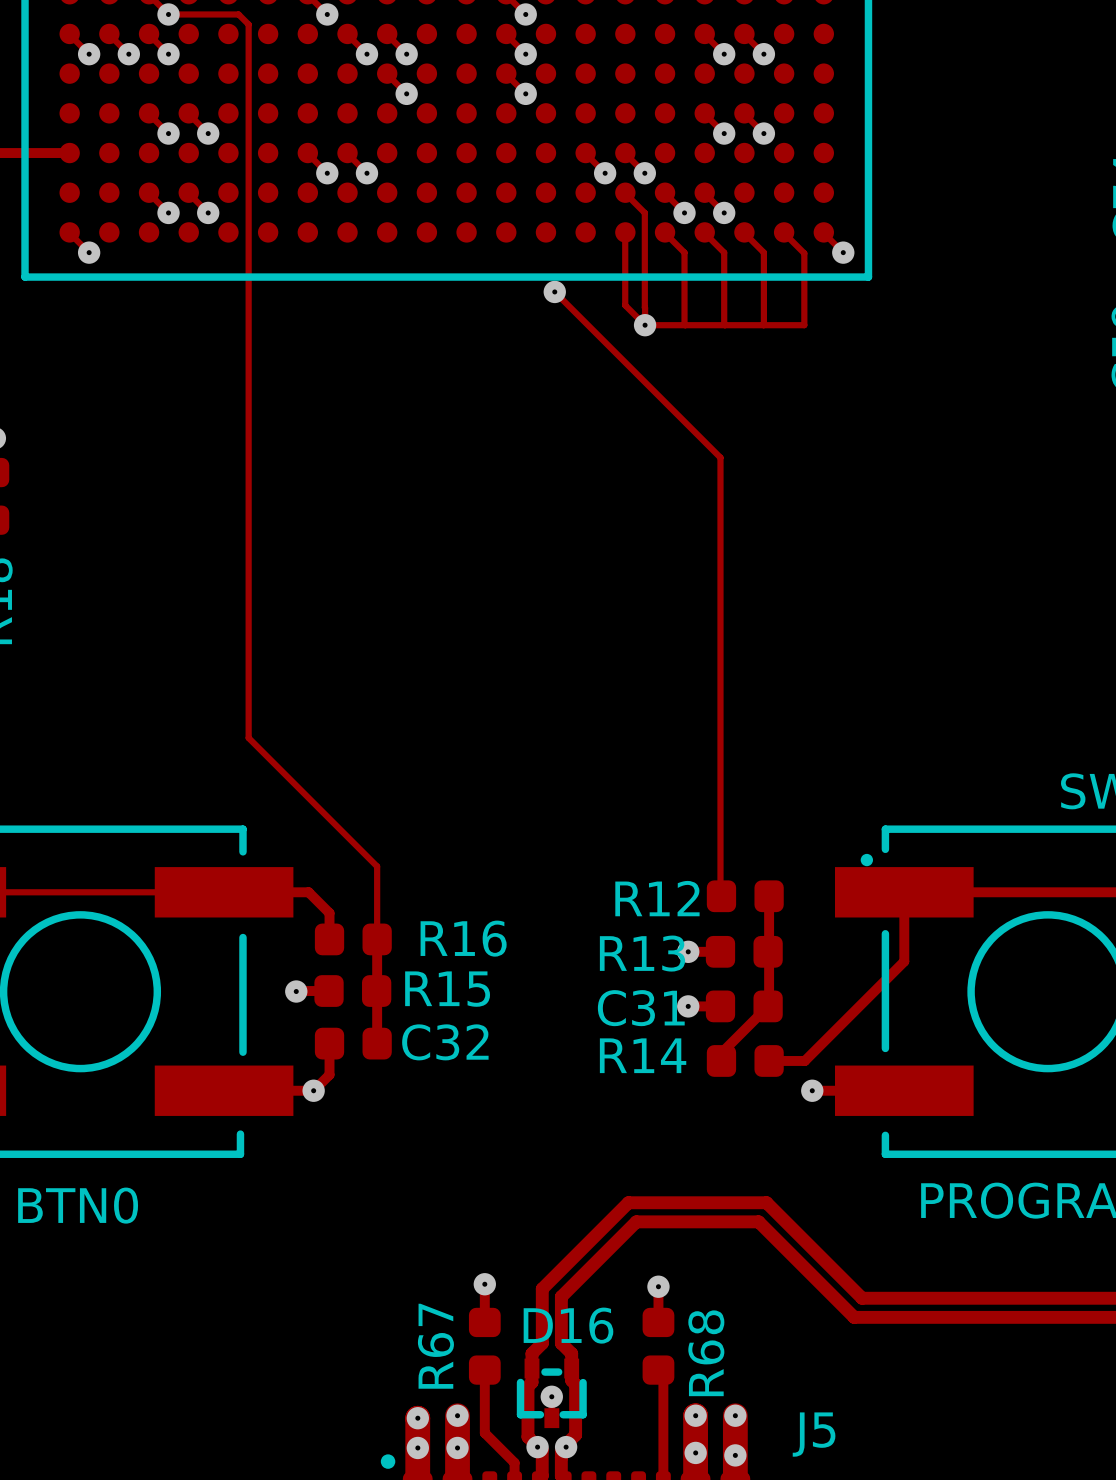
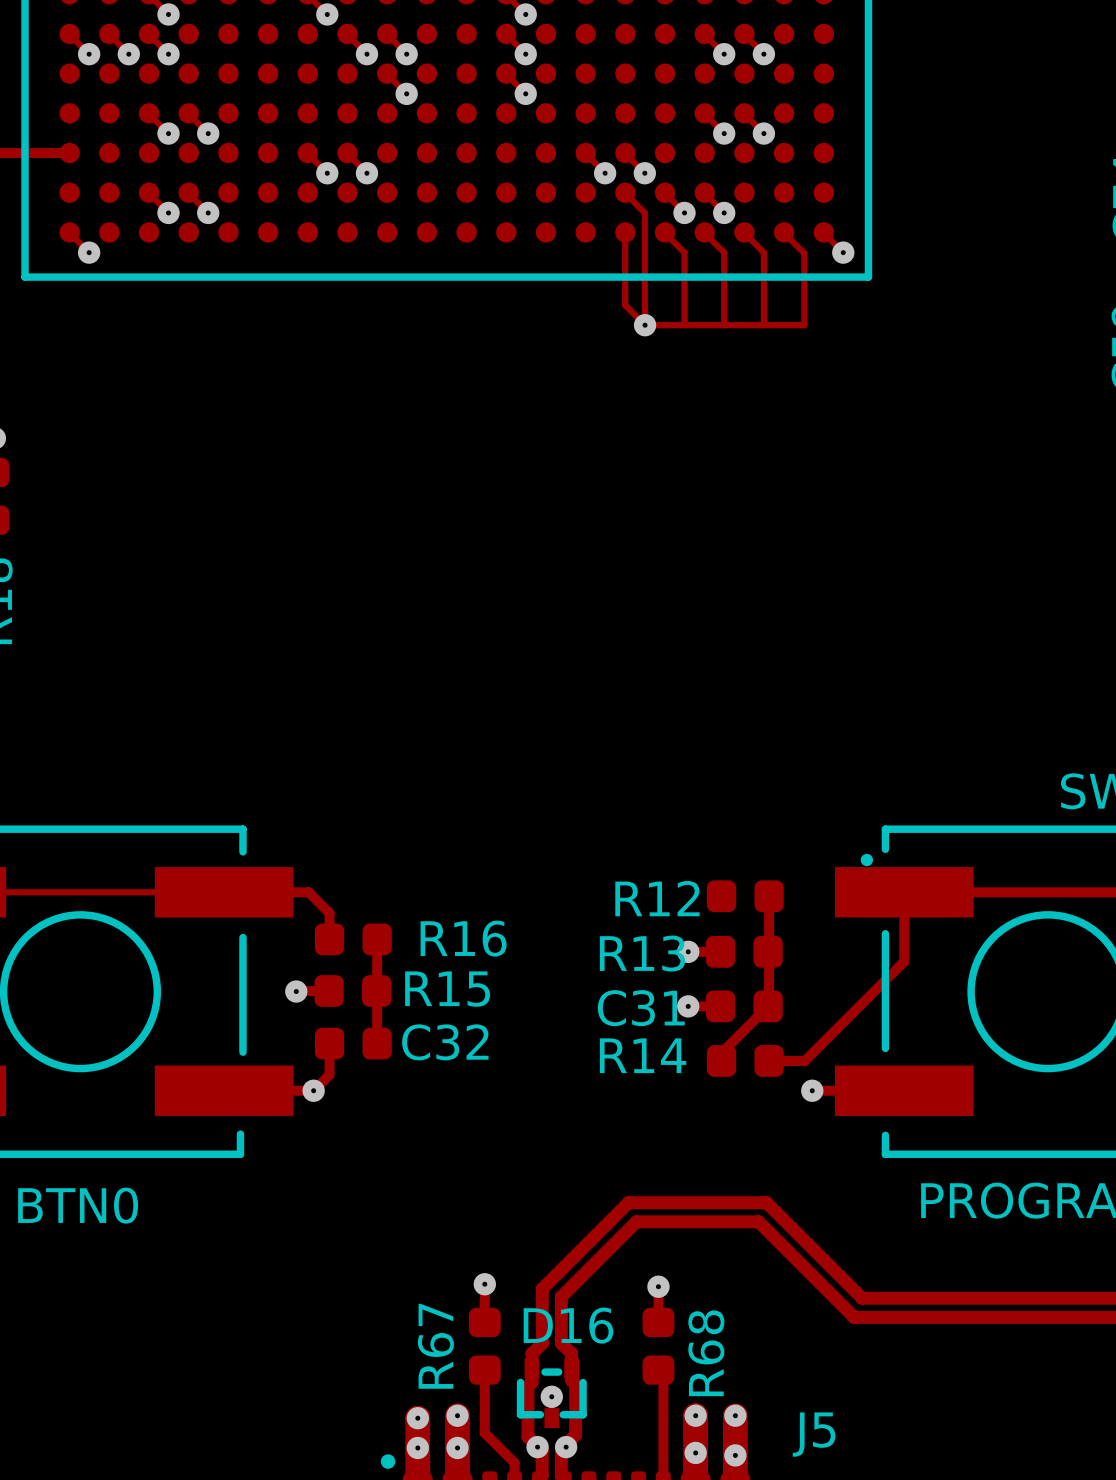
track: (168, 14) (238, 14) (248, 24) (248, 737) (377, 866) (377, 939) -> none
track: (554, 291) (720, 457) (721, 896) -> none
via: (554, 291) -> none

